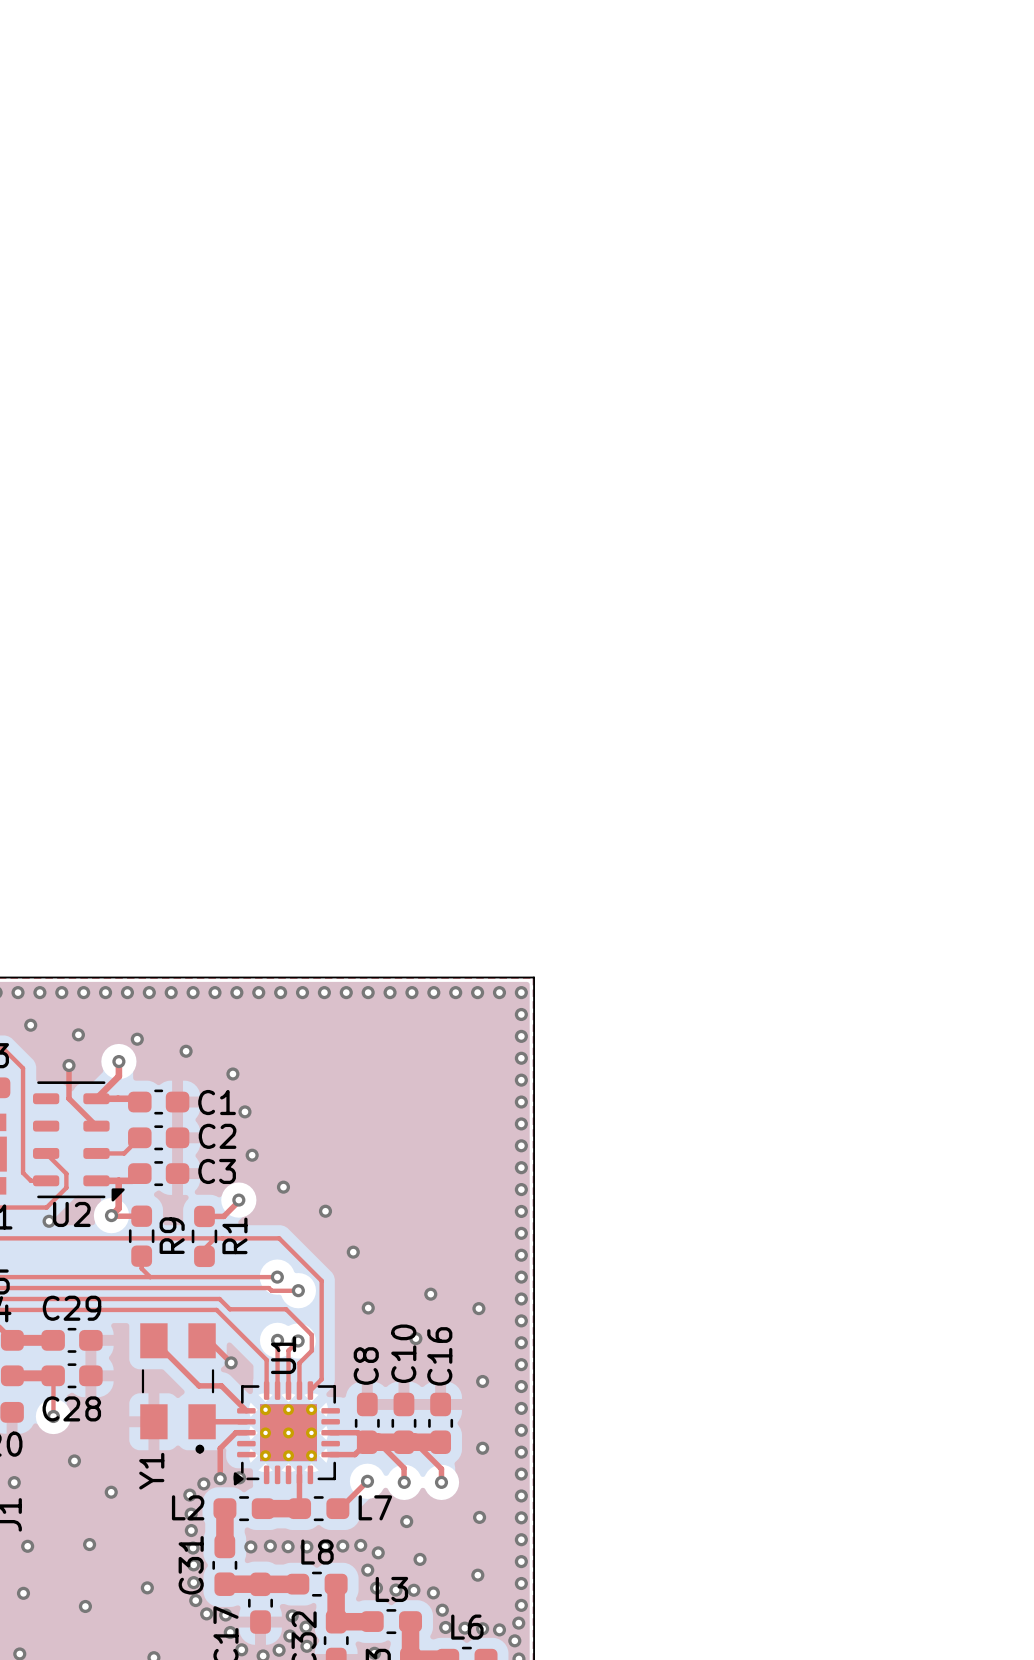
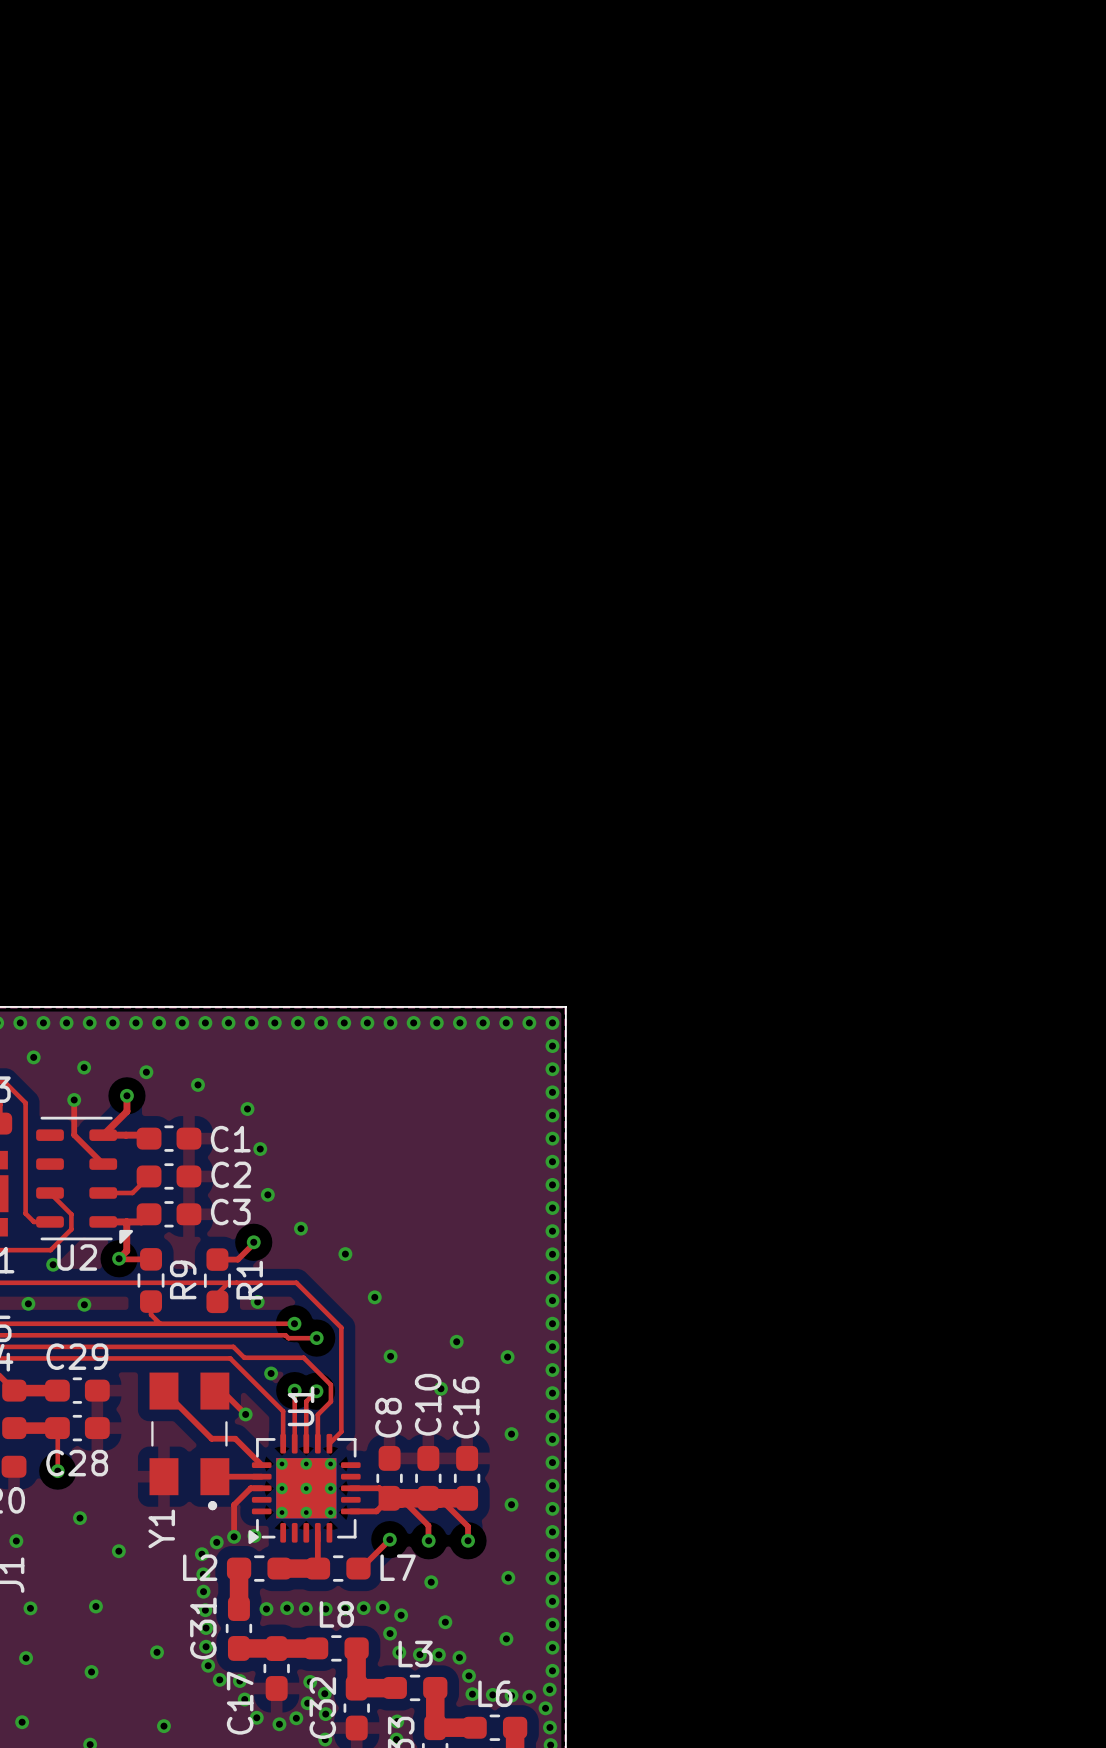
via: none -> (257, 1301)
via: none -> (28, 1303)
via: none -> (84, 1304)
via: none -> (271, 1373)

